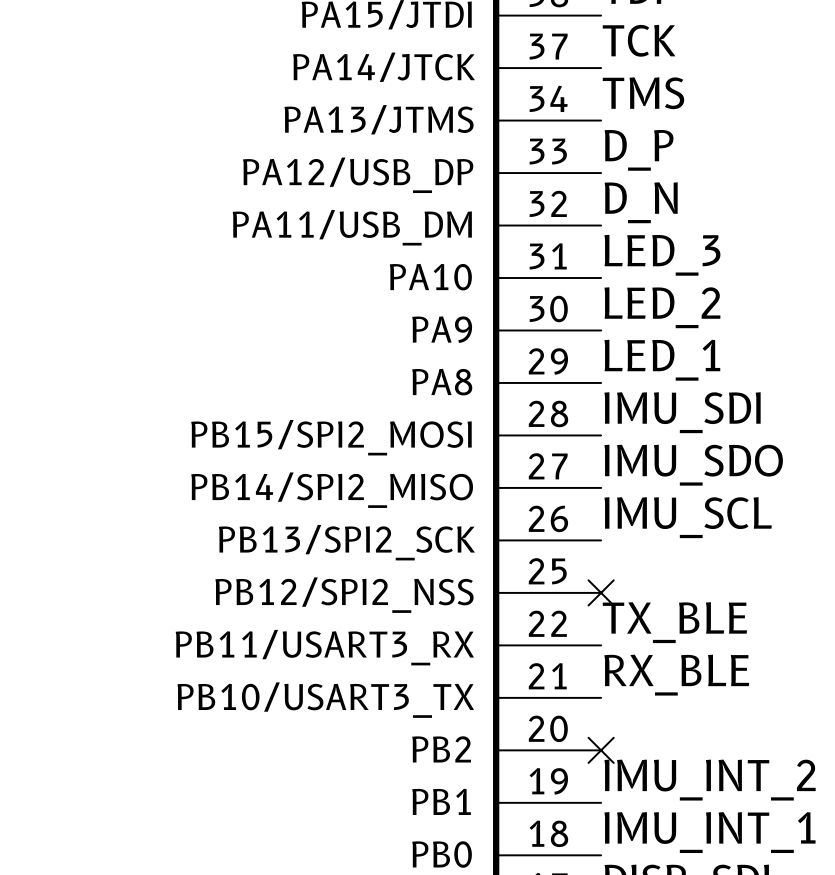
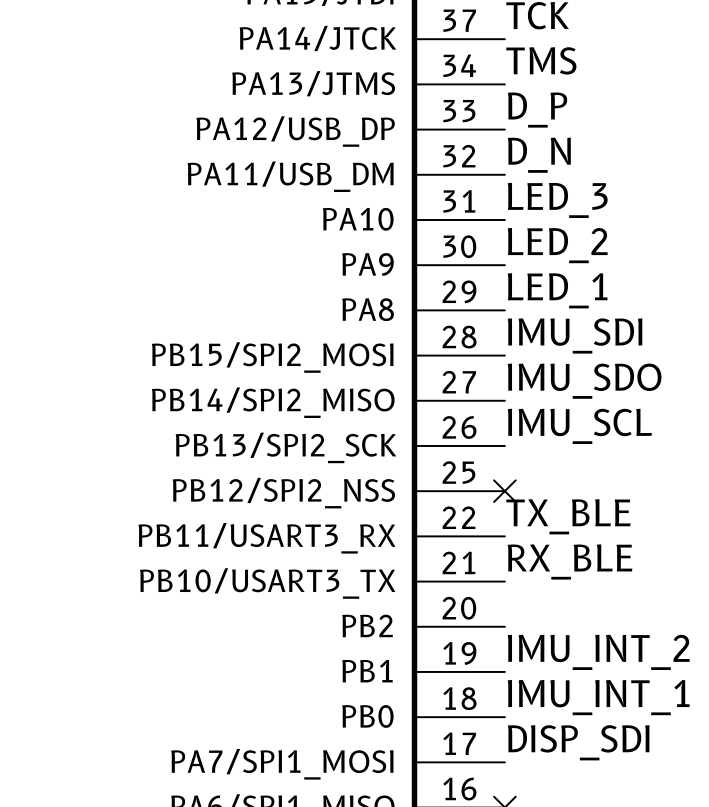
no-connect mark: (601, 750) -> none

